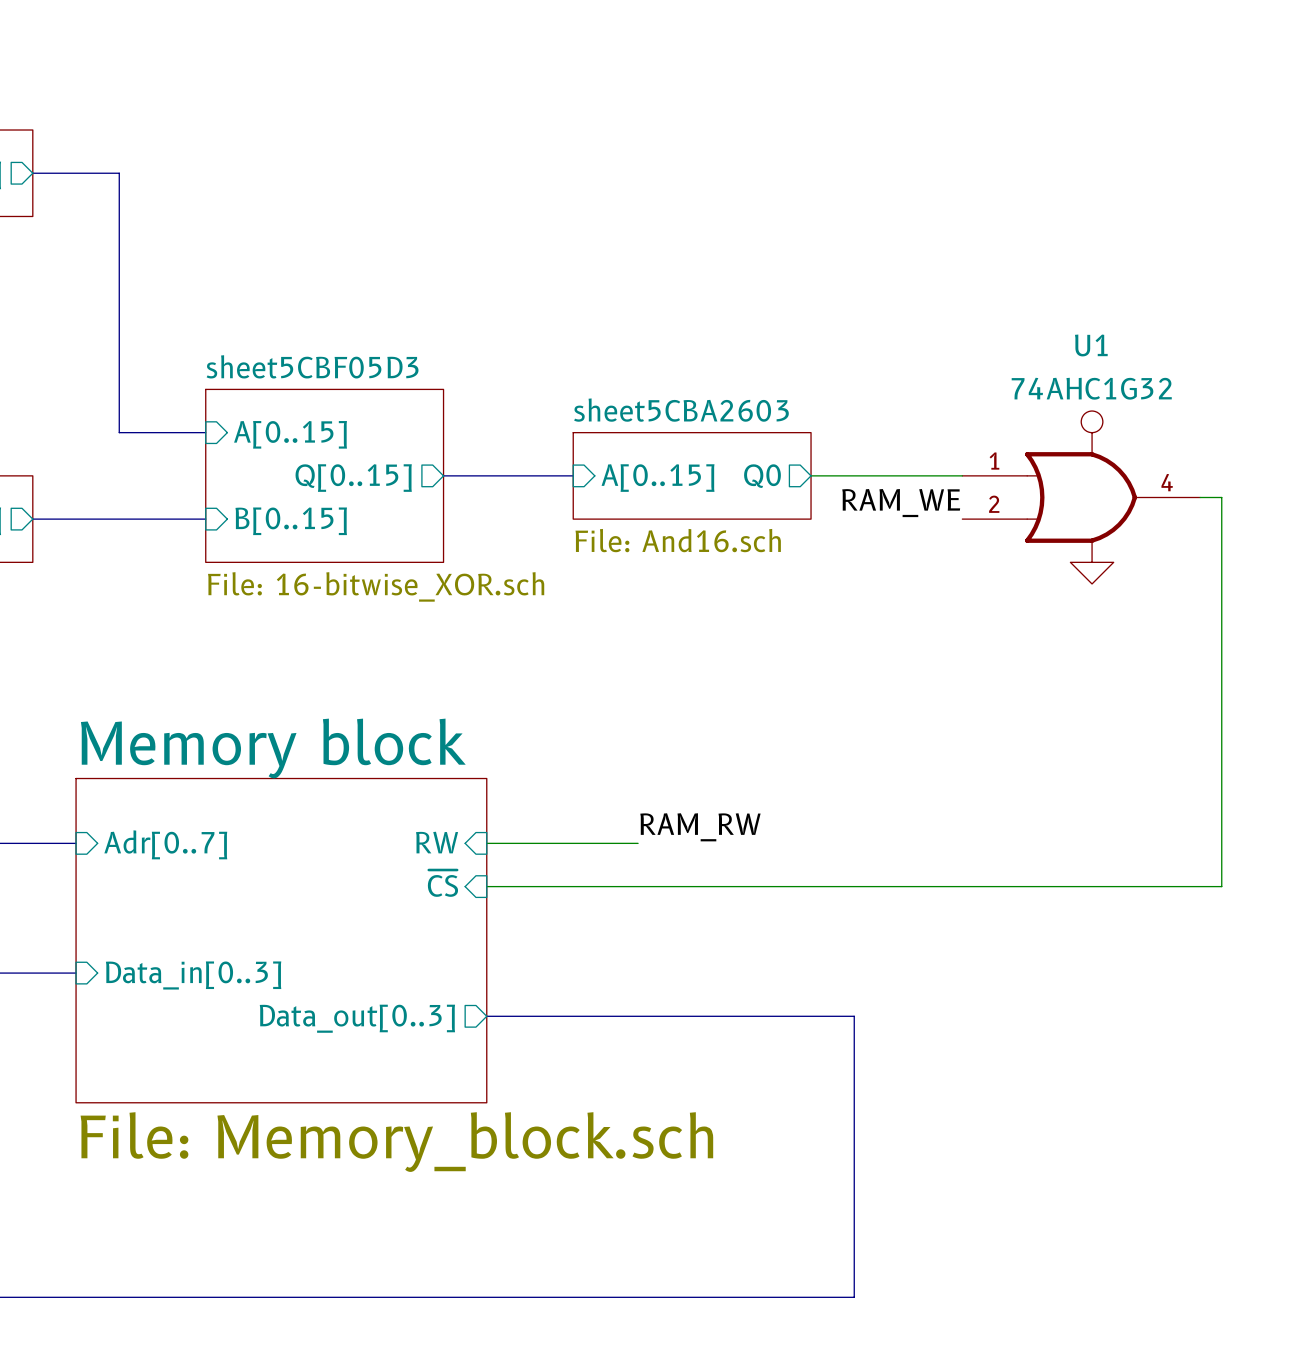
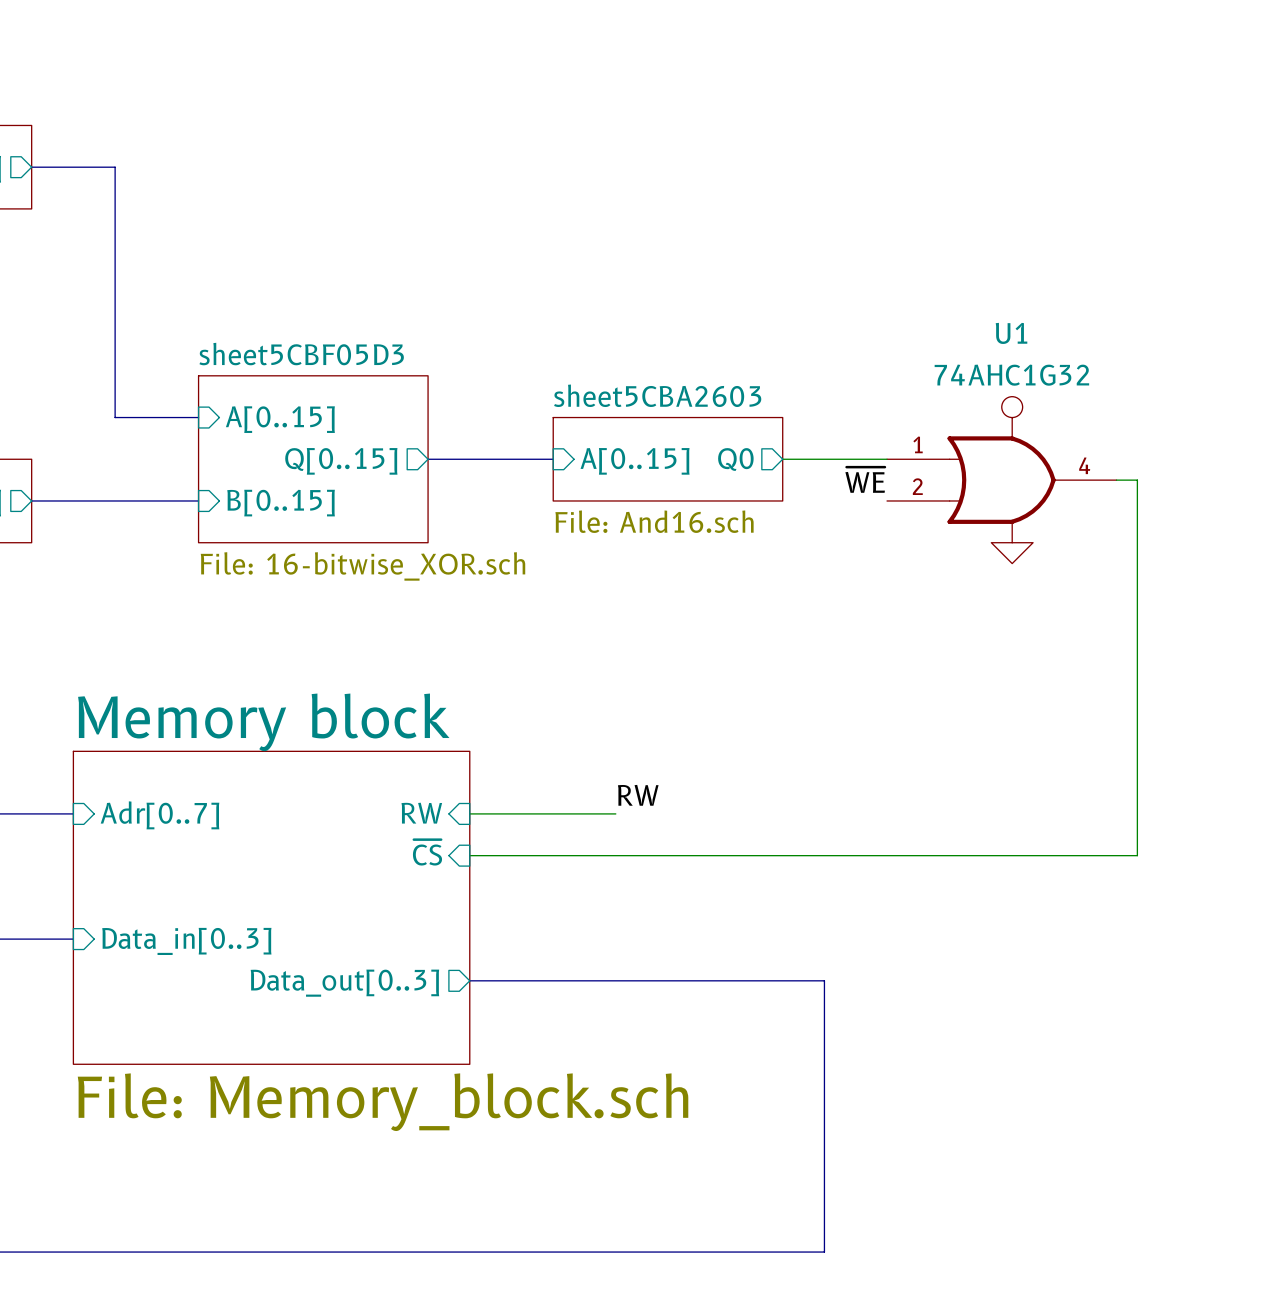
power symbol position: (1092, 432) -> (1012, 417)
label: none -> ~{WE} (865, 479)
U1 position: (1081, 497) -> (1001, 480)
wire: (1200, 497) (1221, 497) (1221, 886) (1178, 886) -> (1116, 480) (1137, 480) (1137, 855)
label: RAM_WE (901, 503) -> none
power symbol position: (1092, 562) -> (1012, 542)
label: RAM_RW (700, 827) -> RW (638, 795)

